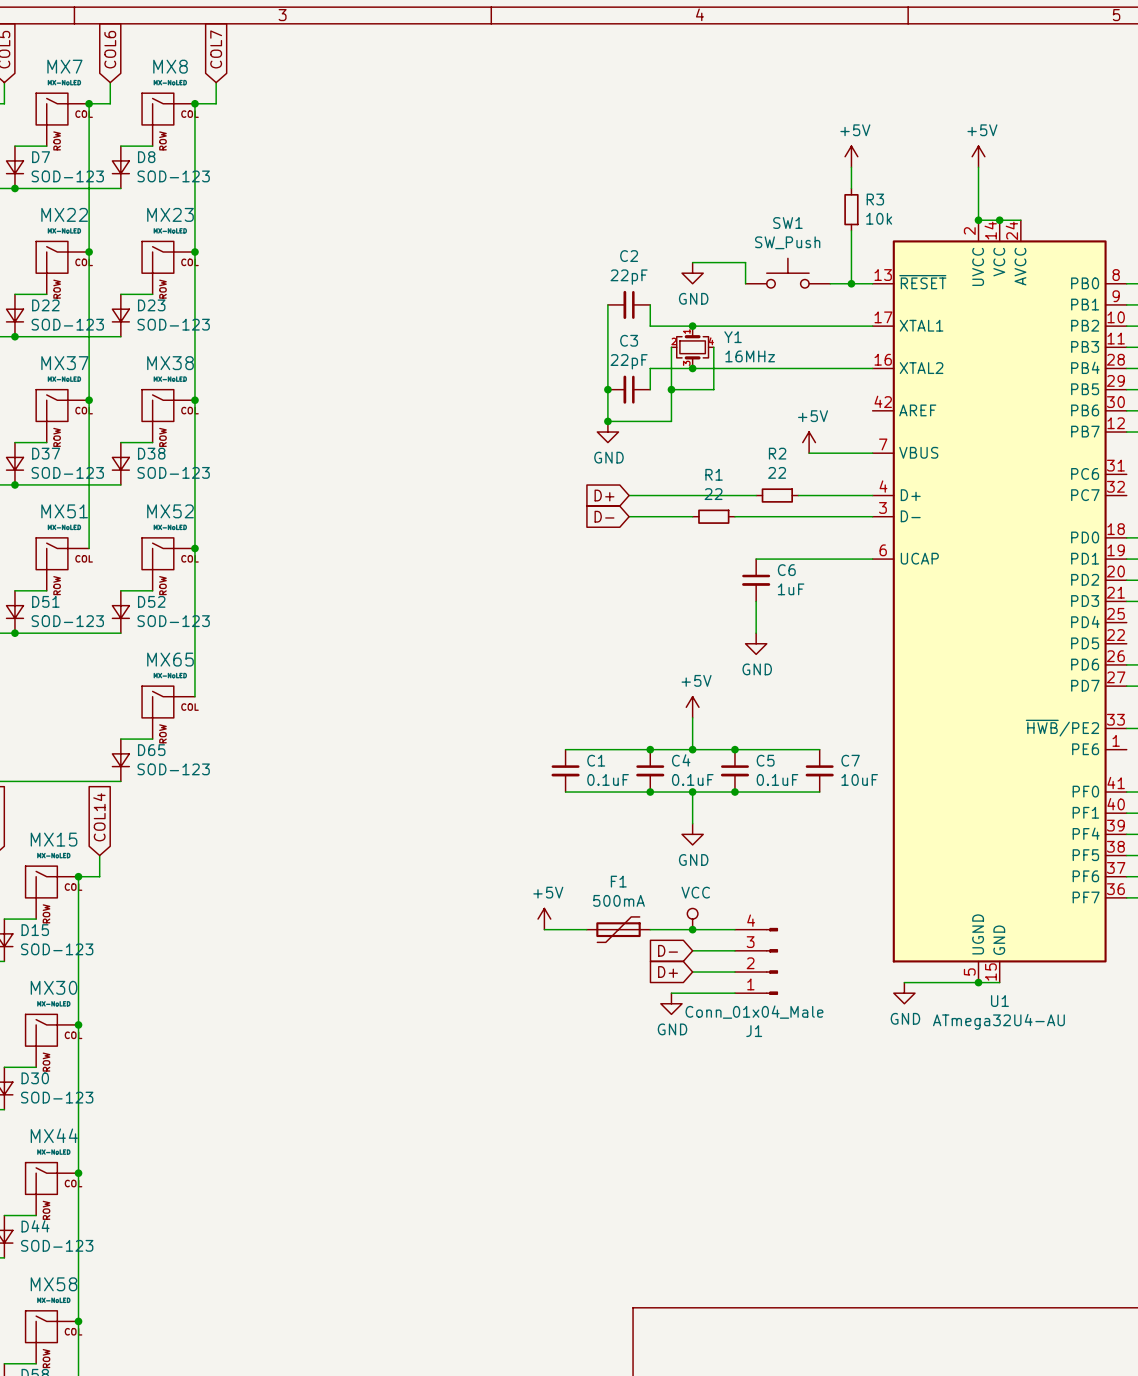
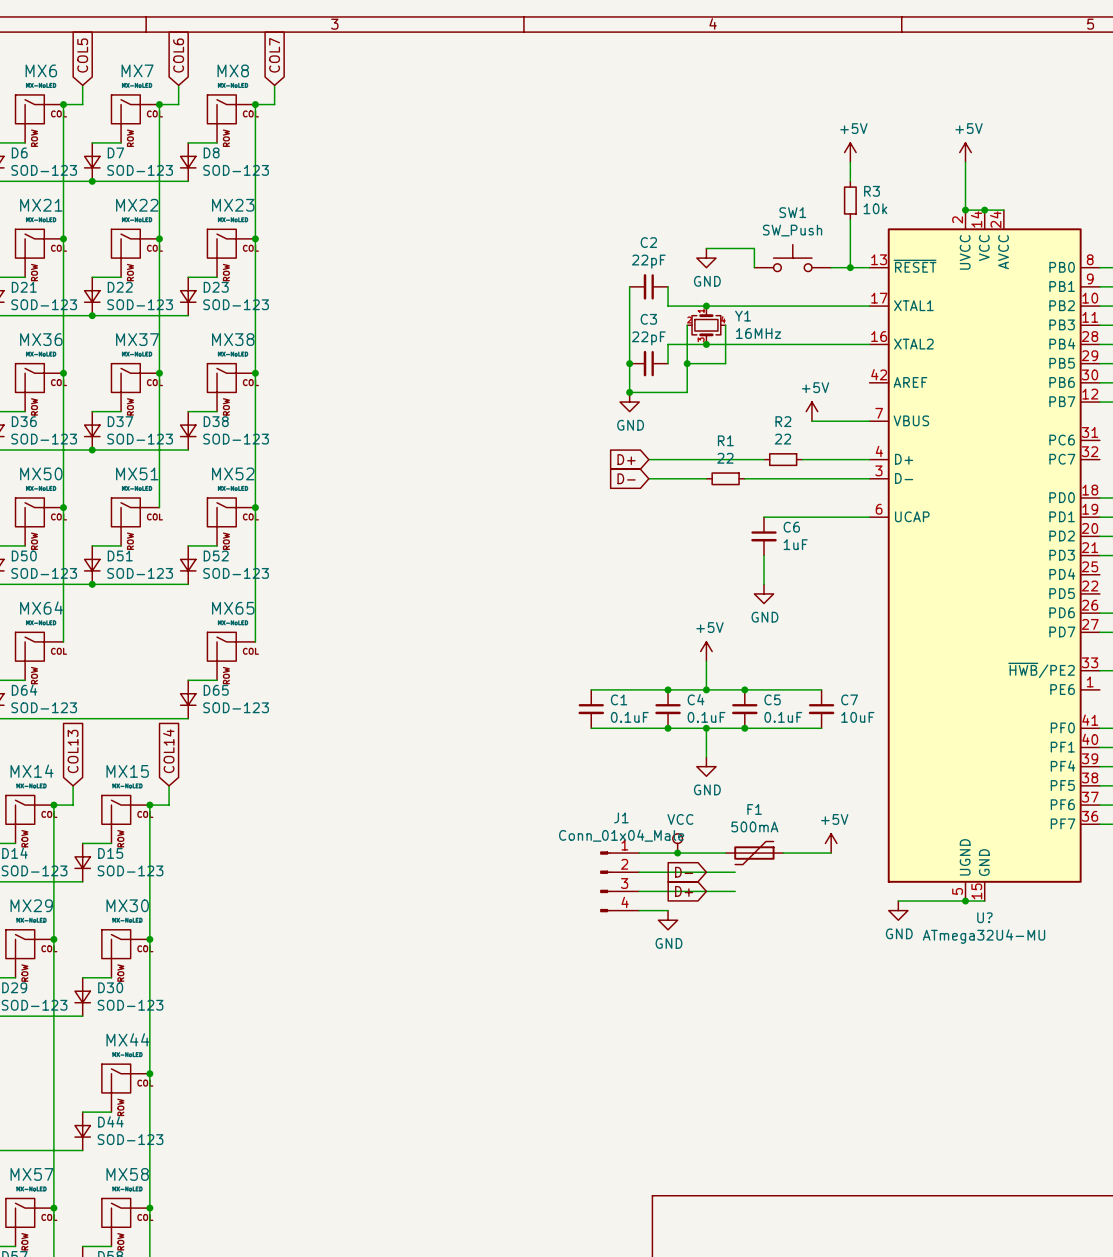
power symbol: +5V (544, 919) -> none
power symbol position: VCC (692, 919) -> VCC (677, 843)
power symbol: none -> +5V (831, 843)
wire: (544, 929) (586, 929) -> none
F1 position: (618, 929) -> (754, 853)
junction position: (692, 929) -> (677, 853)
wire: none -> (783, 853) (831, 853)
wire: none -> (639, 872) (706, 872)
wire: (724, 950) (734, 950) -> none
J1 position: (756, 961) -> (619, 881)
J1 rotation: 0° (772, 961) -> 180° (605, 881)
wire: none -> (639, 891) (706, 891)
wire: (724, 972) (734, 972) -> none
wire: none -> (639, 910) (668, 910)
wire: (671, 993) (734, 993) -> none
U1 name: U1 (999, 1001) -> U? (984, 917)
power symbol position: GND (671, 1003) -> GND (668, 920)
U1 value: ATmega32U4-AU (998, 1021) -> ATmega32U4-MU (984, 936)

